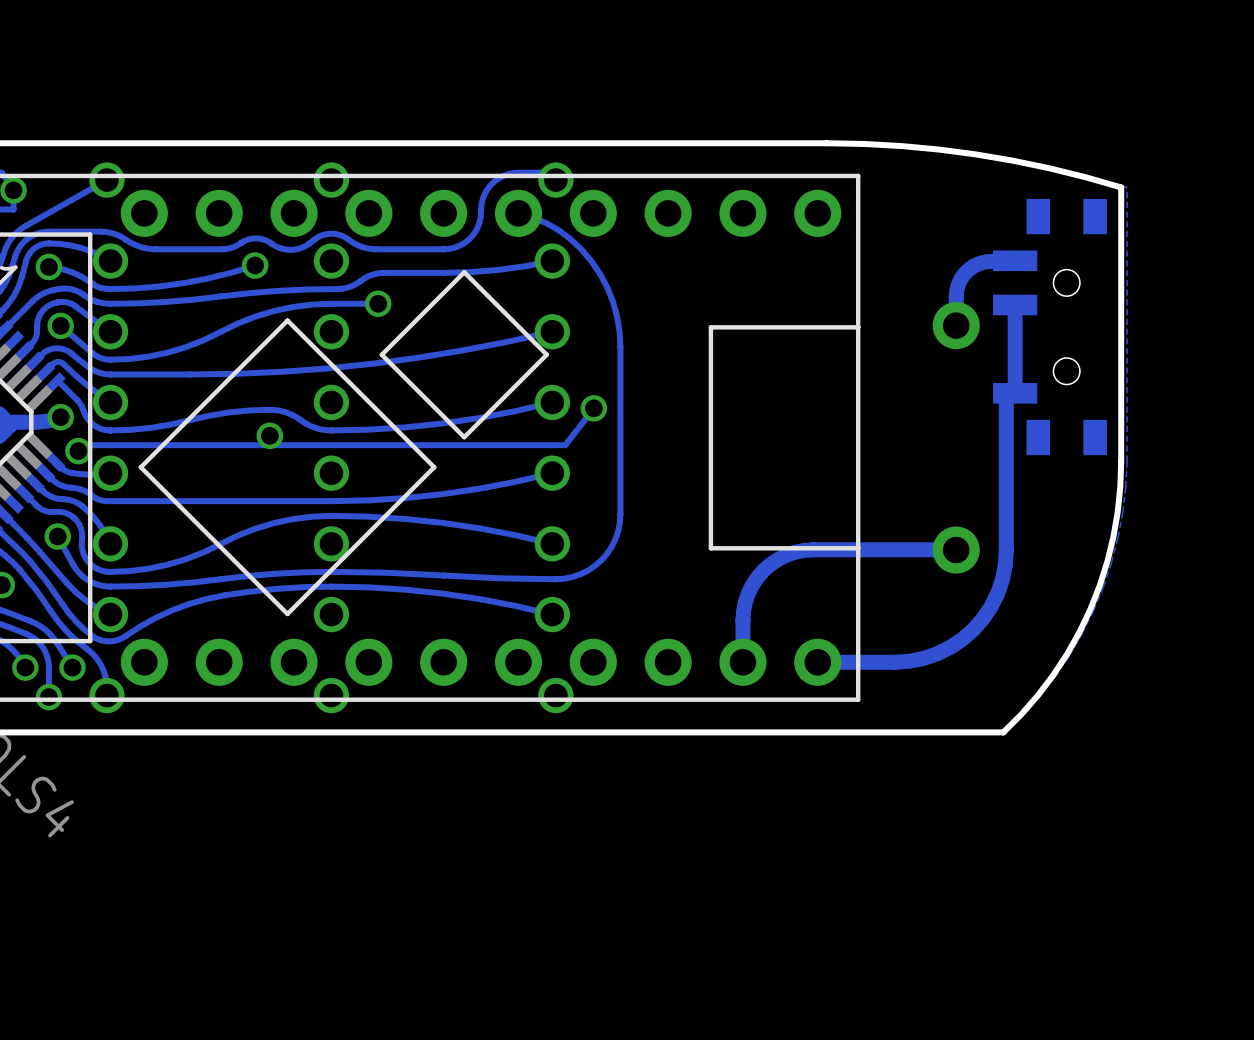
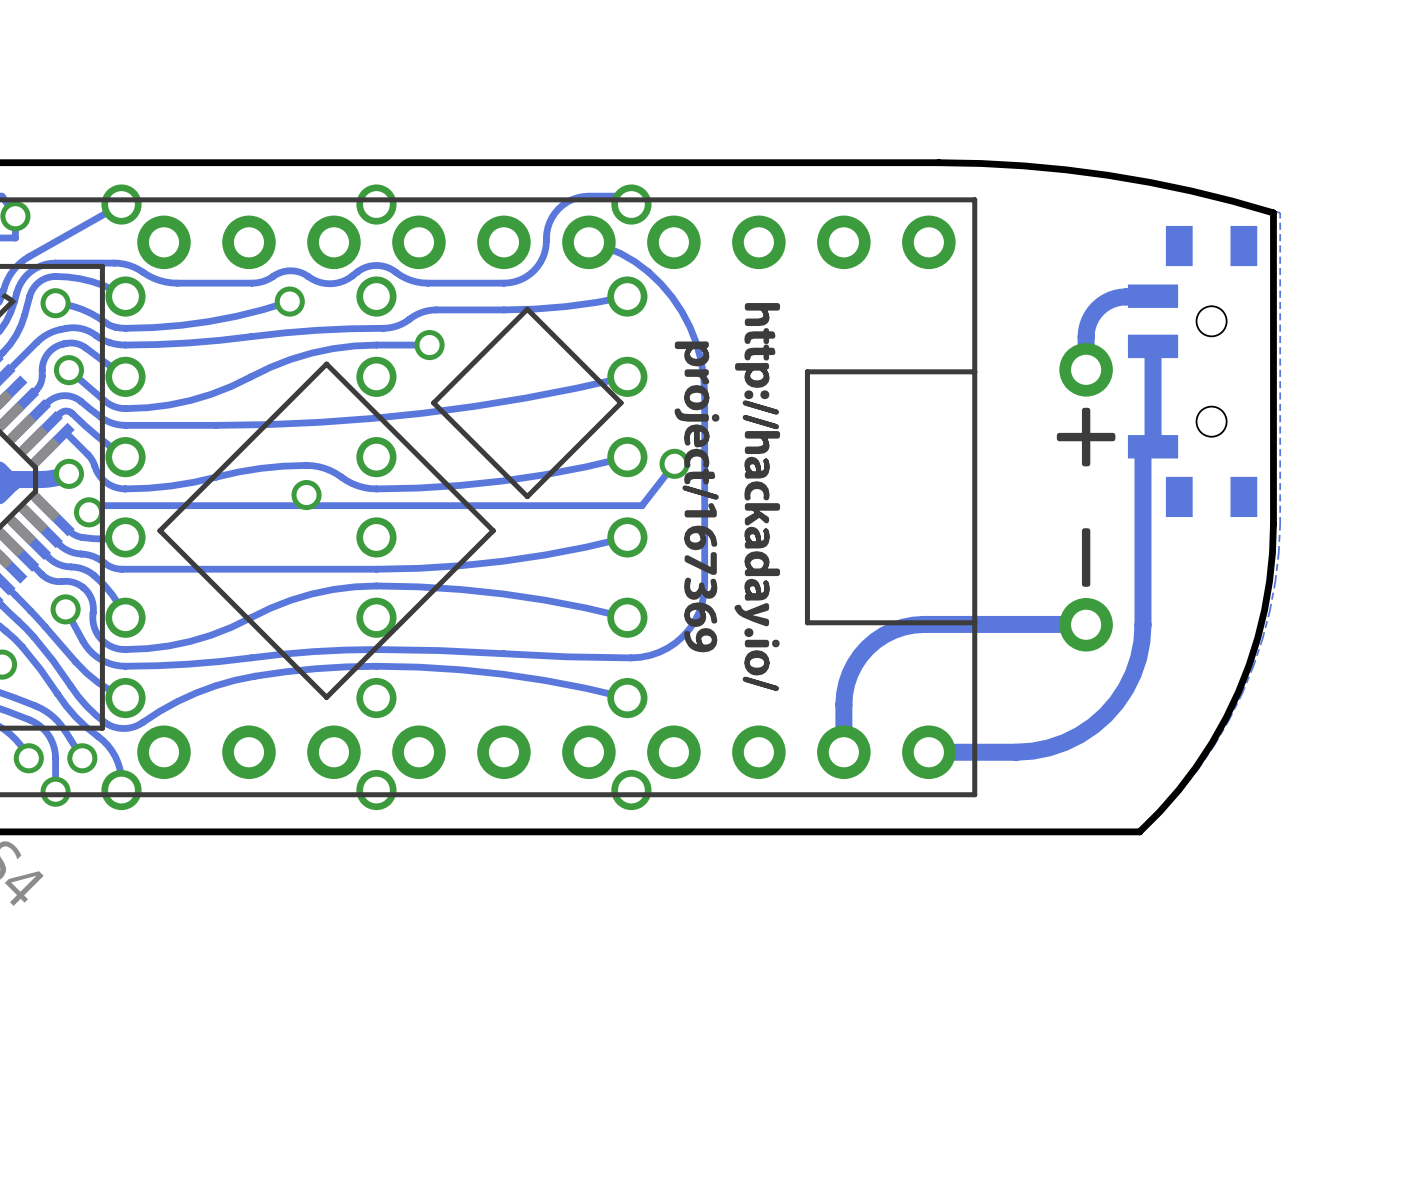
drawing: none -> [674, 303, 781, 692]
drawing: none -> [1056, 407, 1116, 467]
drawing: none -> [1081, 528, 1091, 587]

